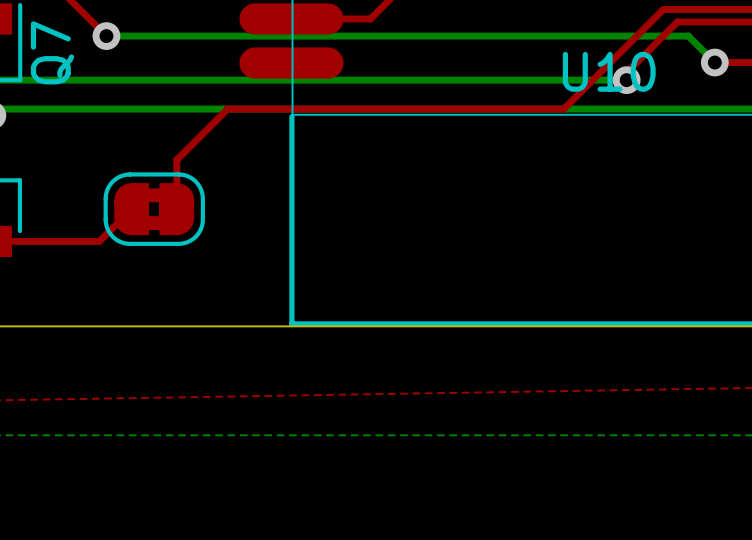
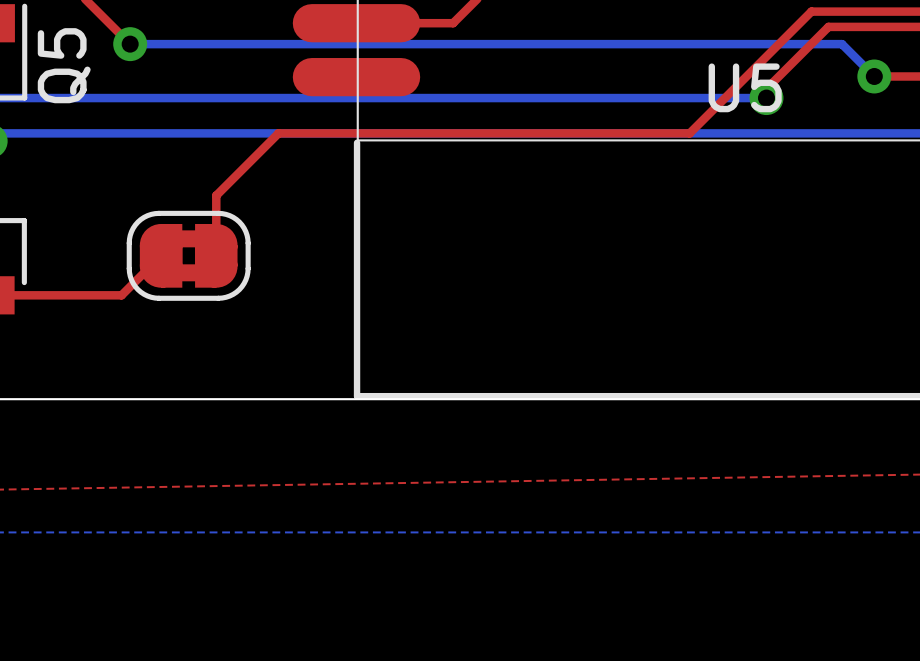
Q7 name: Q7 (52, 52) -> Q5 (64, 65)
U10 name: U10 (609, 71) -> U5 (745, 87)

